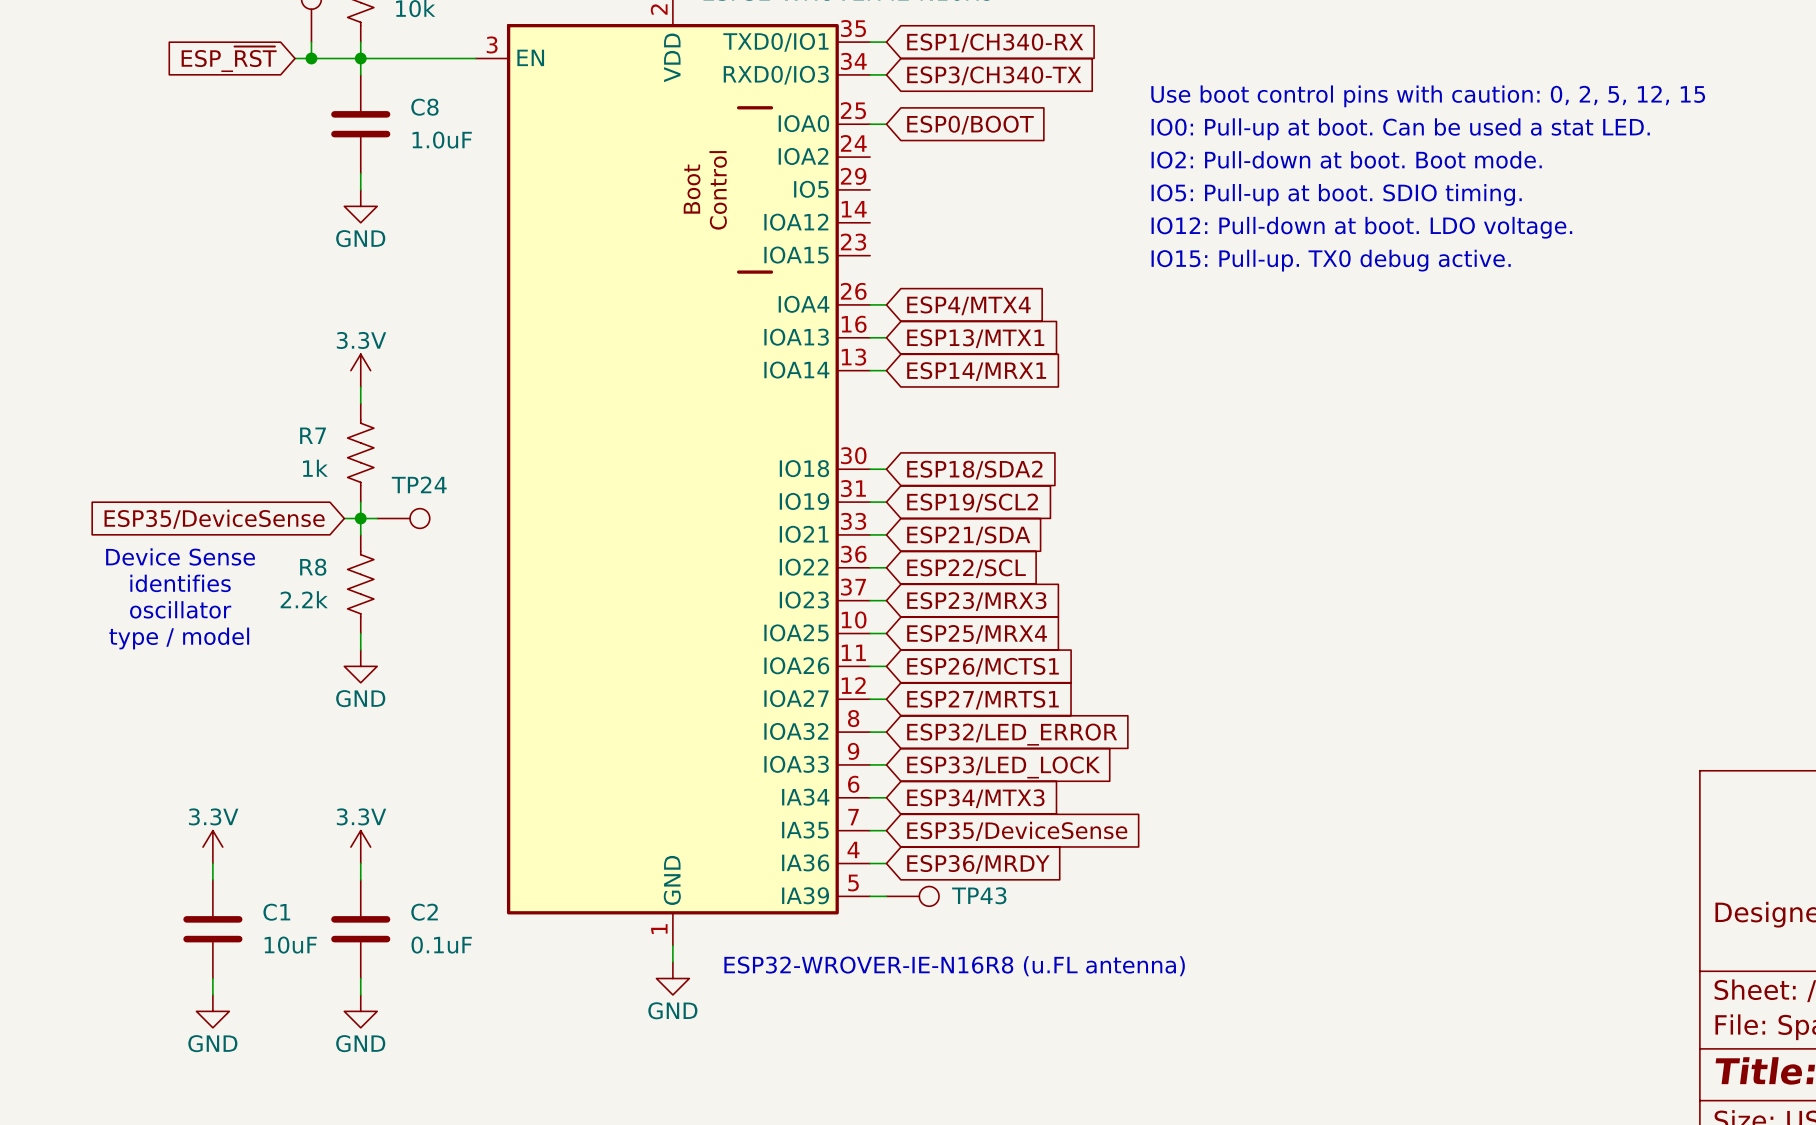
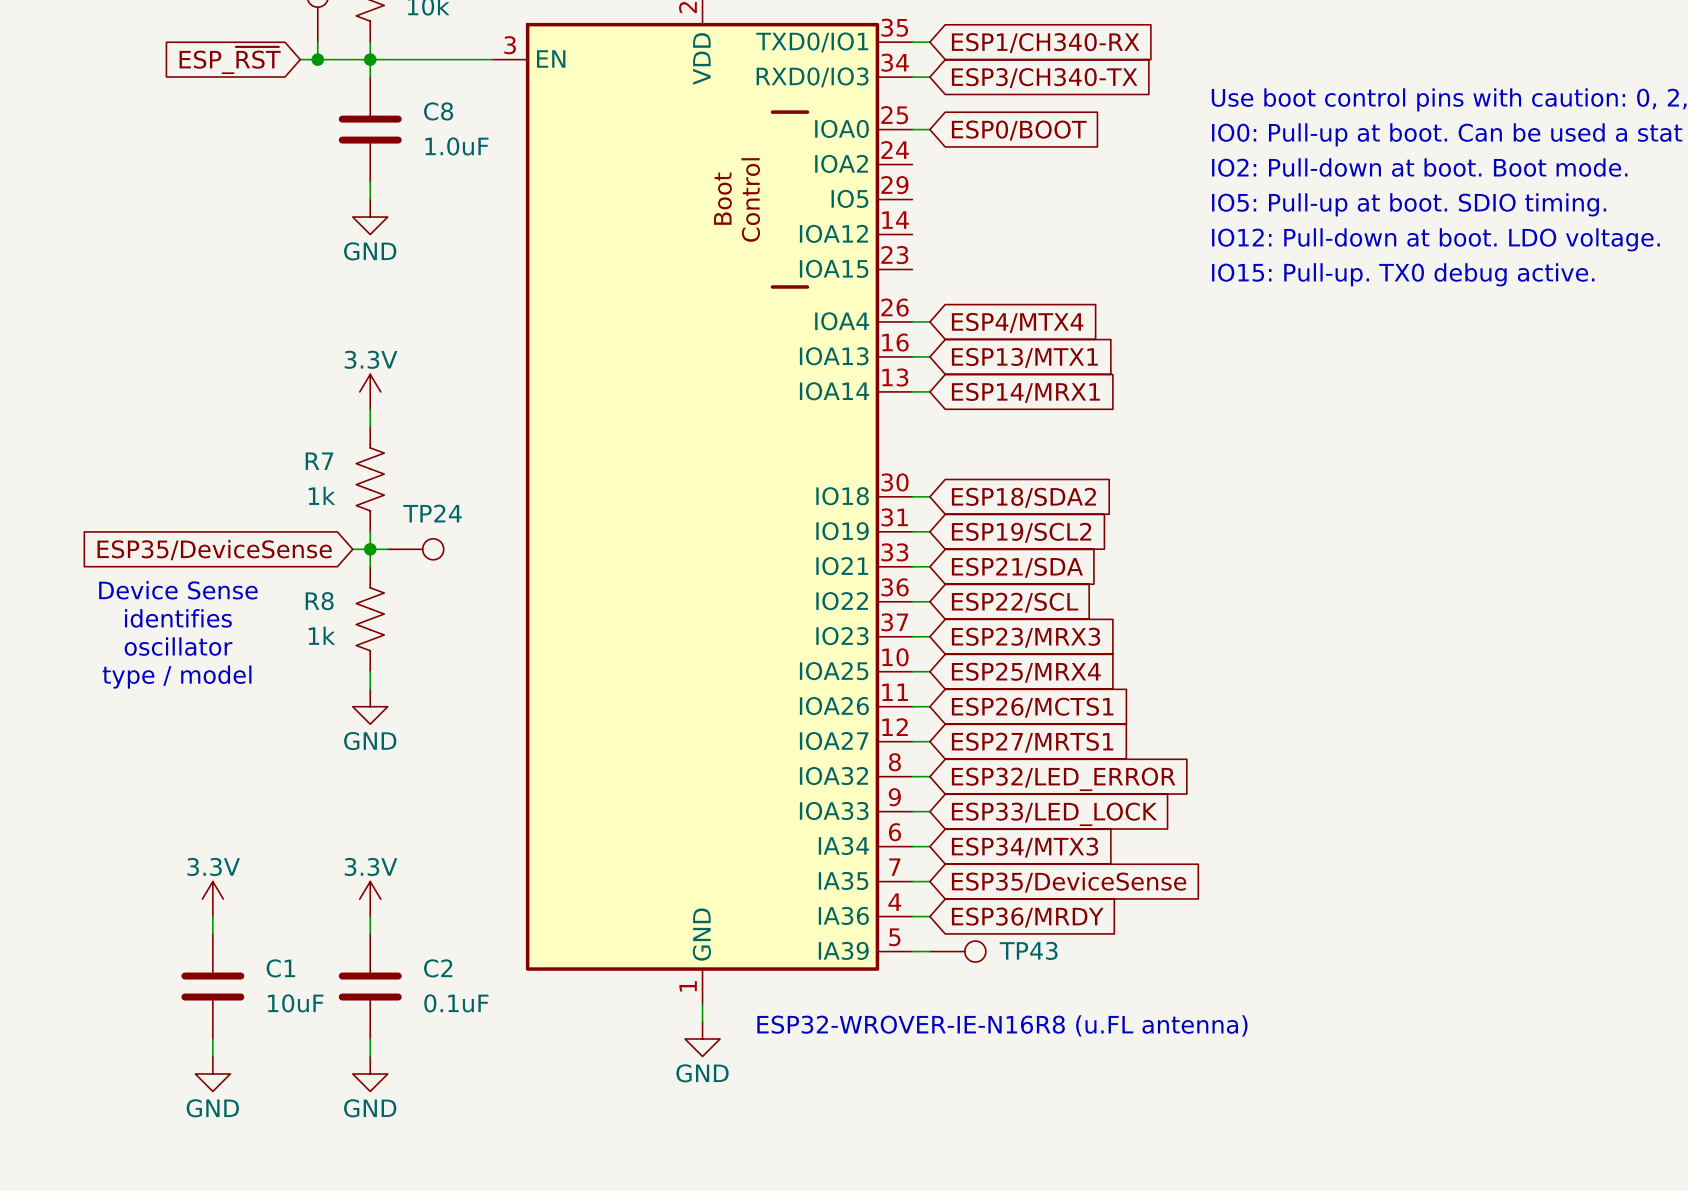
R8 value: 2.2k (304, 599) -> 1k (321, 635)

